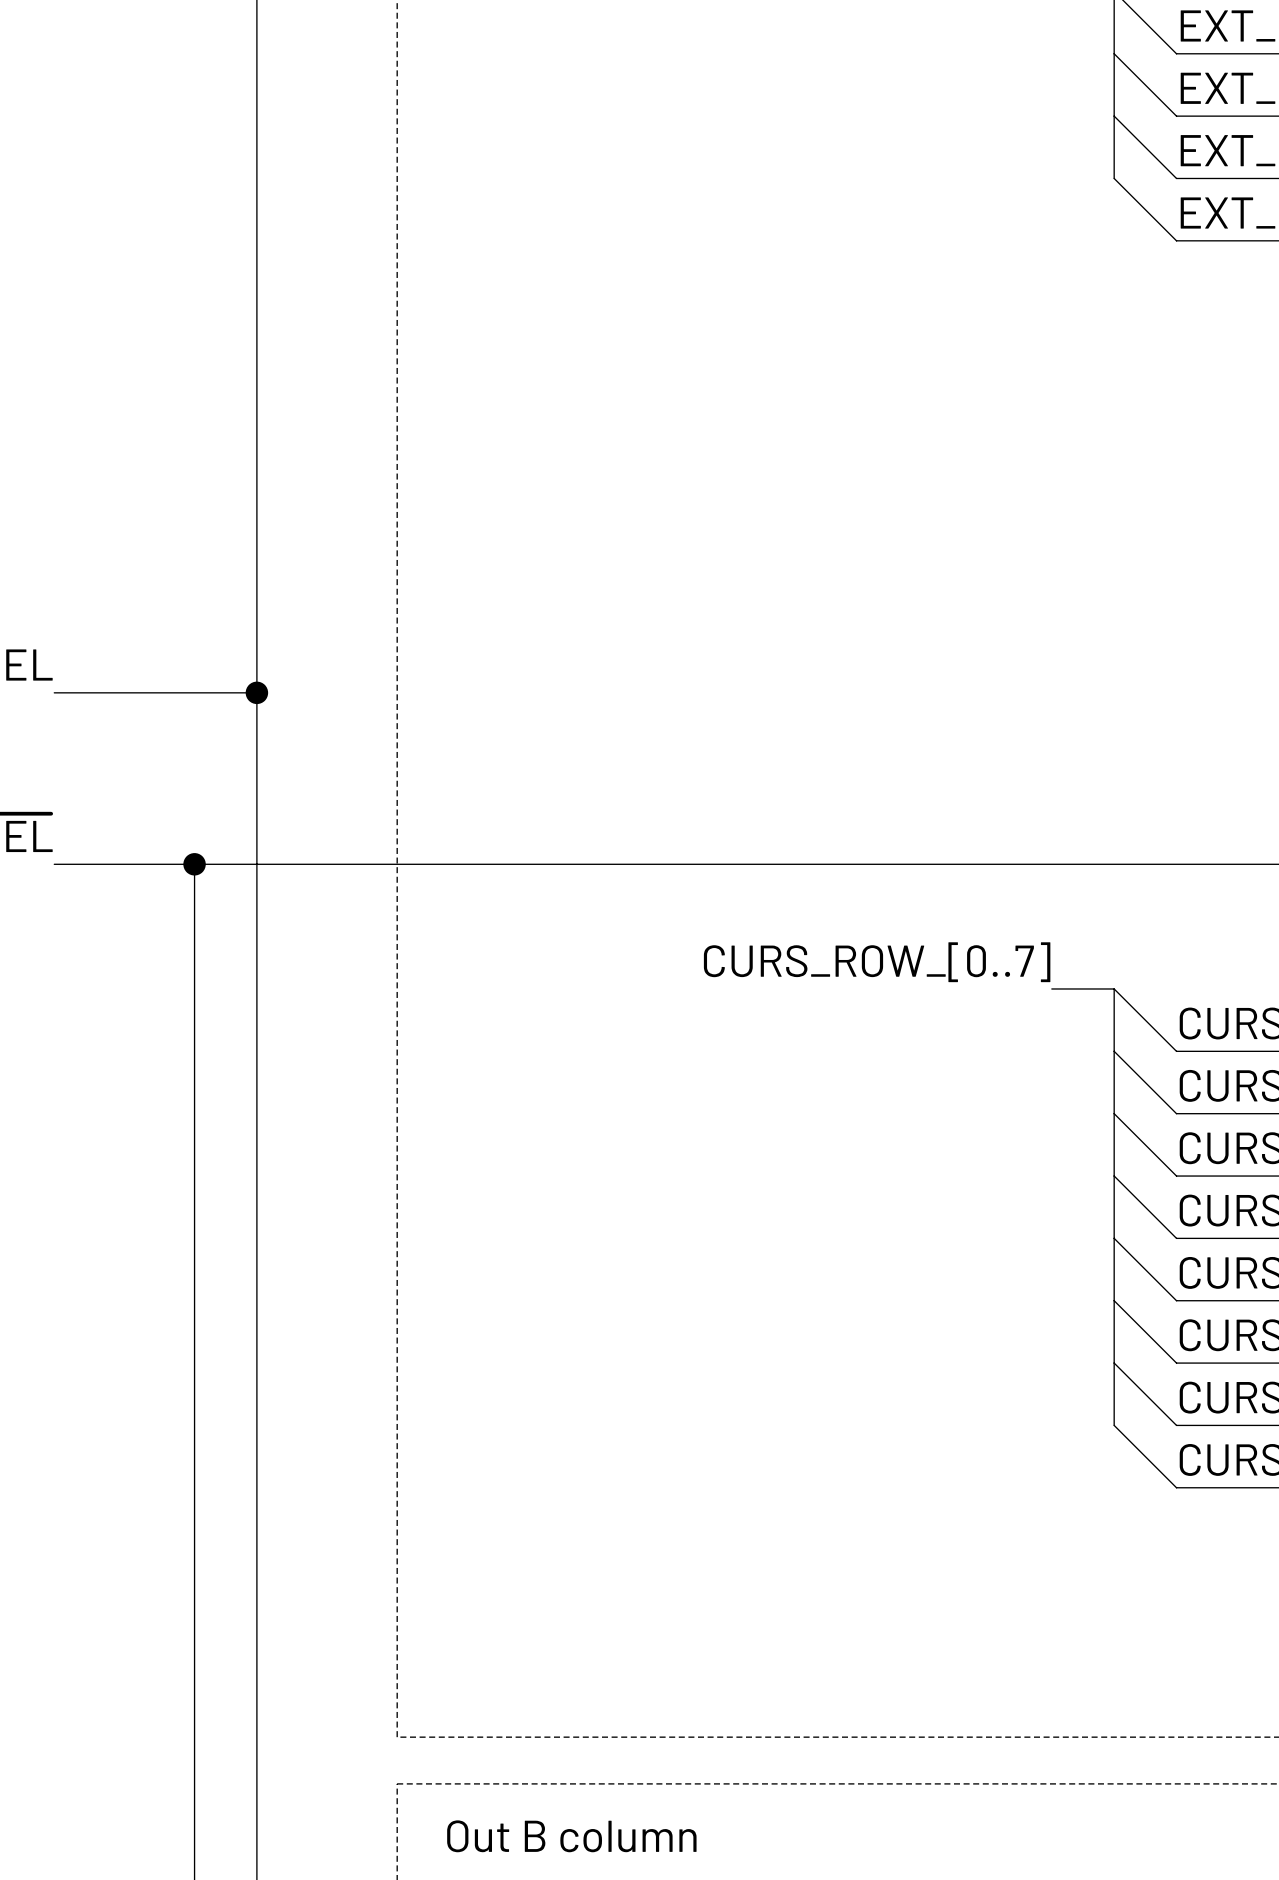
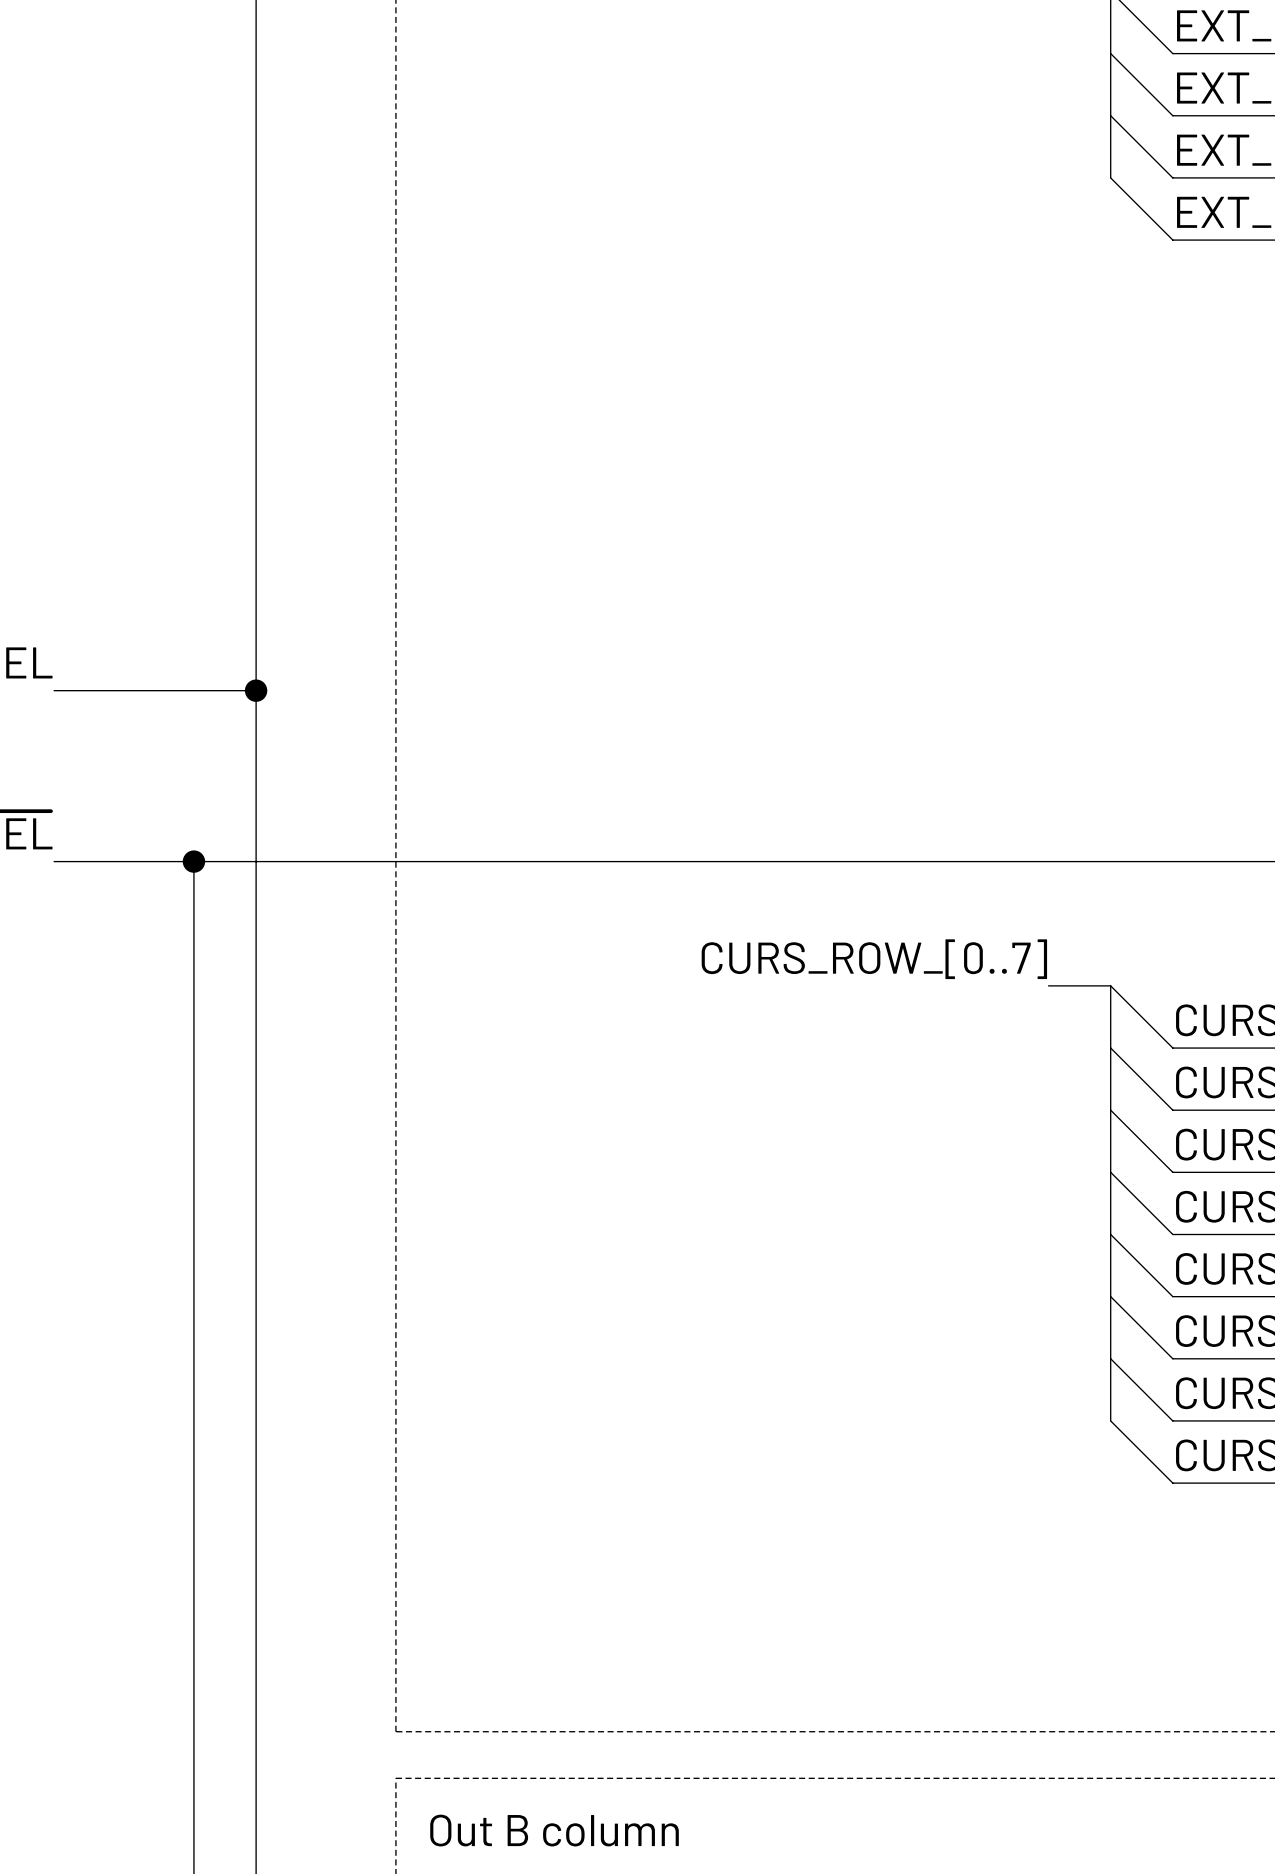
text position: Out B column (571, 1836) -> Out B column (554, 1830)

